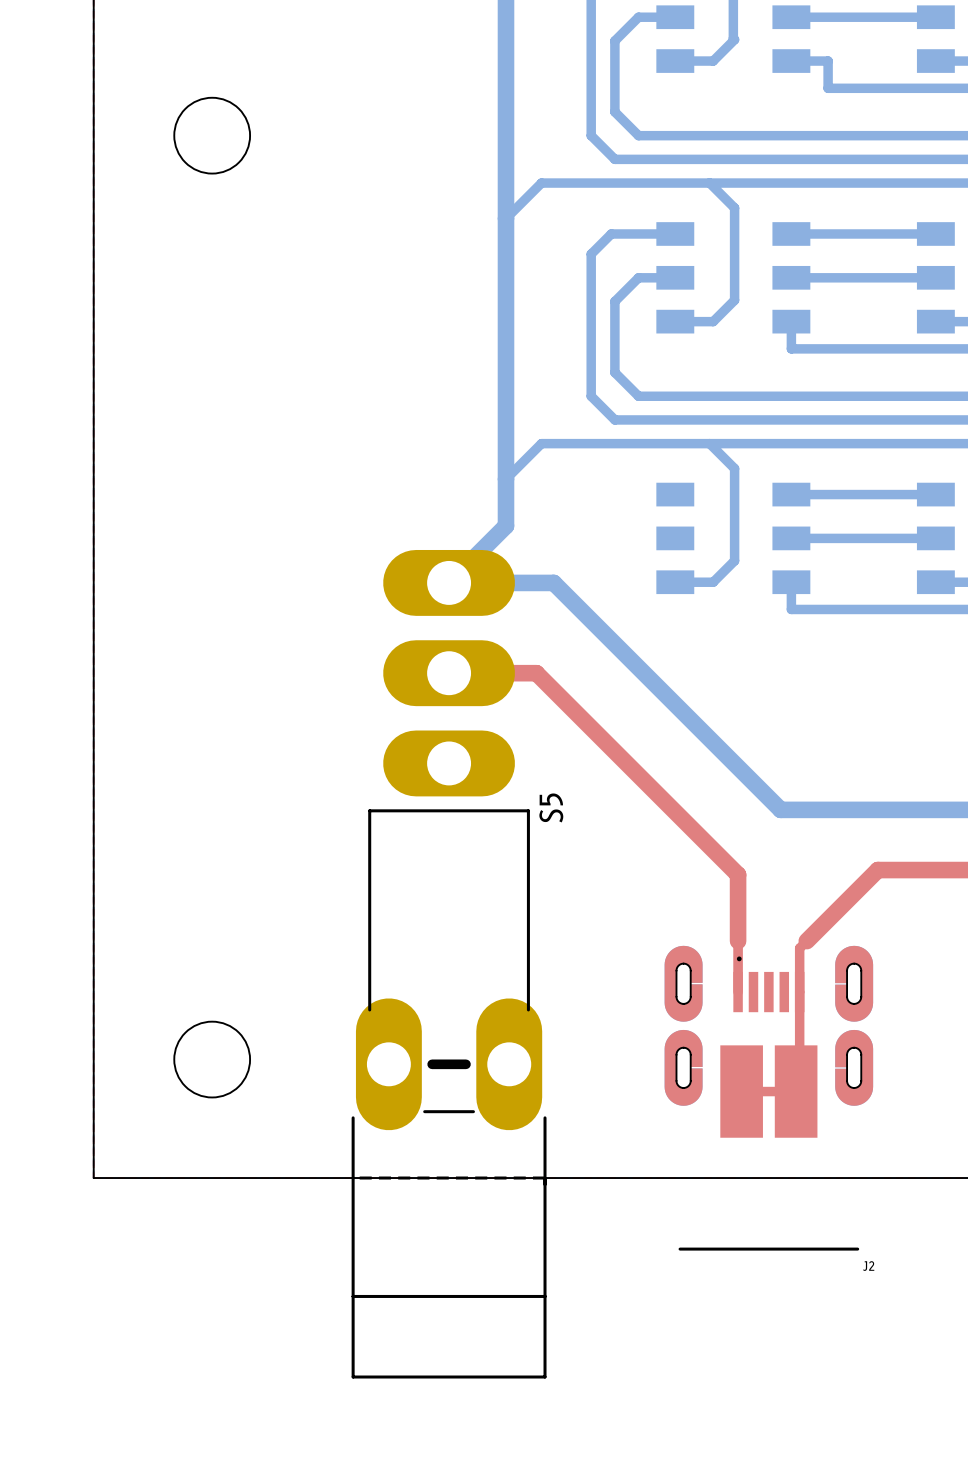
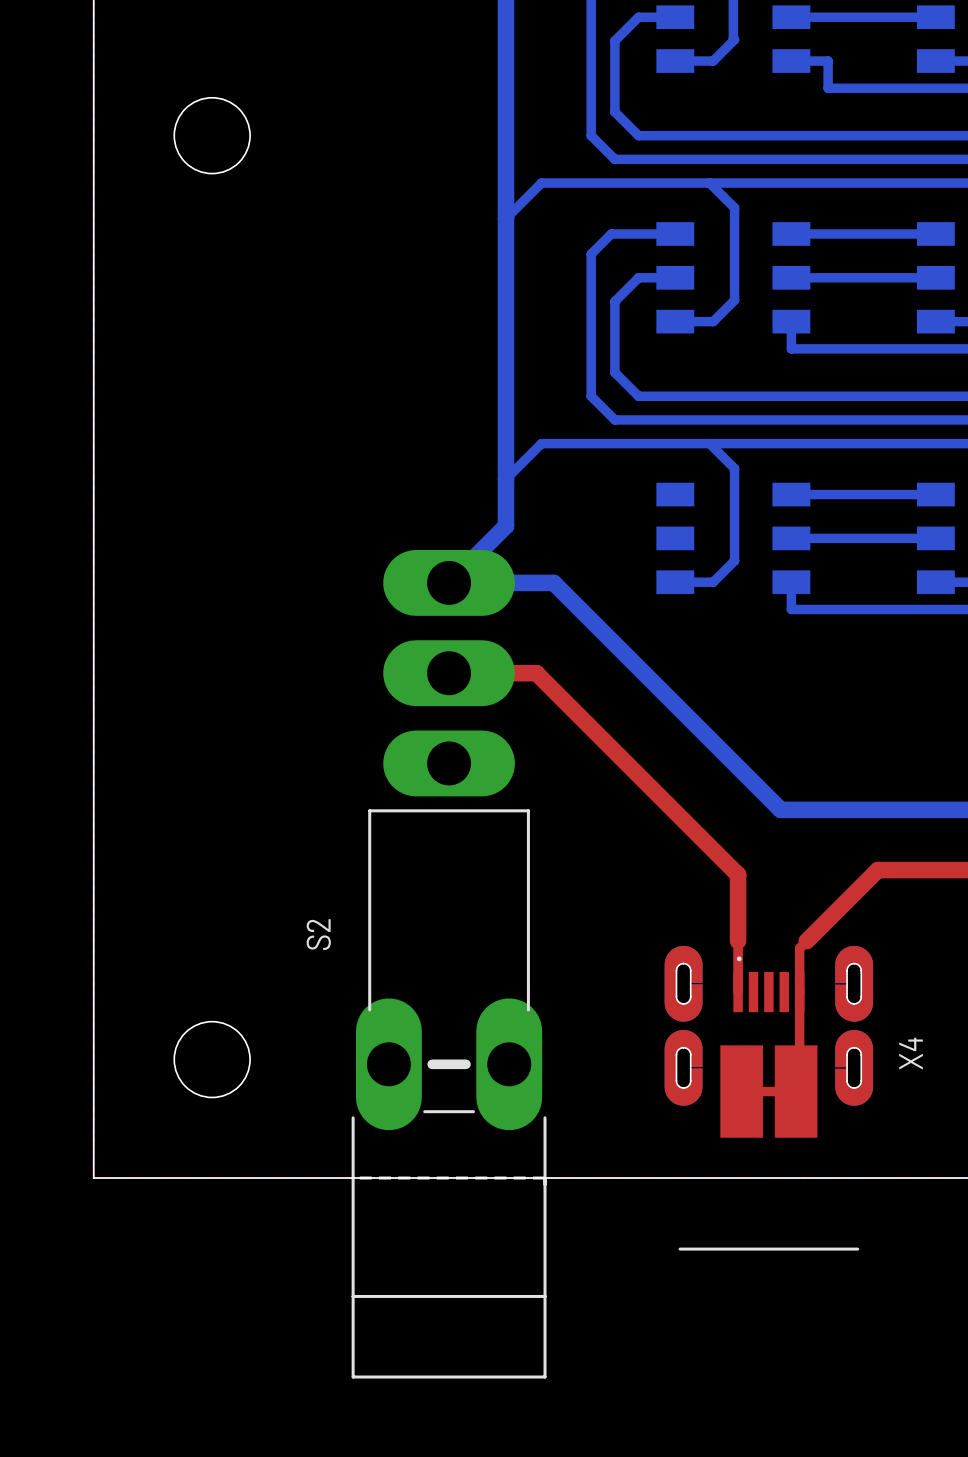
S5 name: S5 (551, 807) -> S2 (318, 934)
J2 name: J2 (868, 1266) -> X4 (911, 1053)

